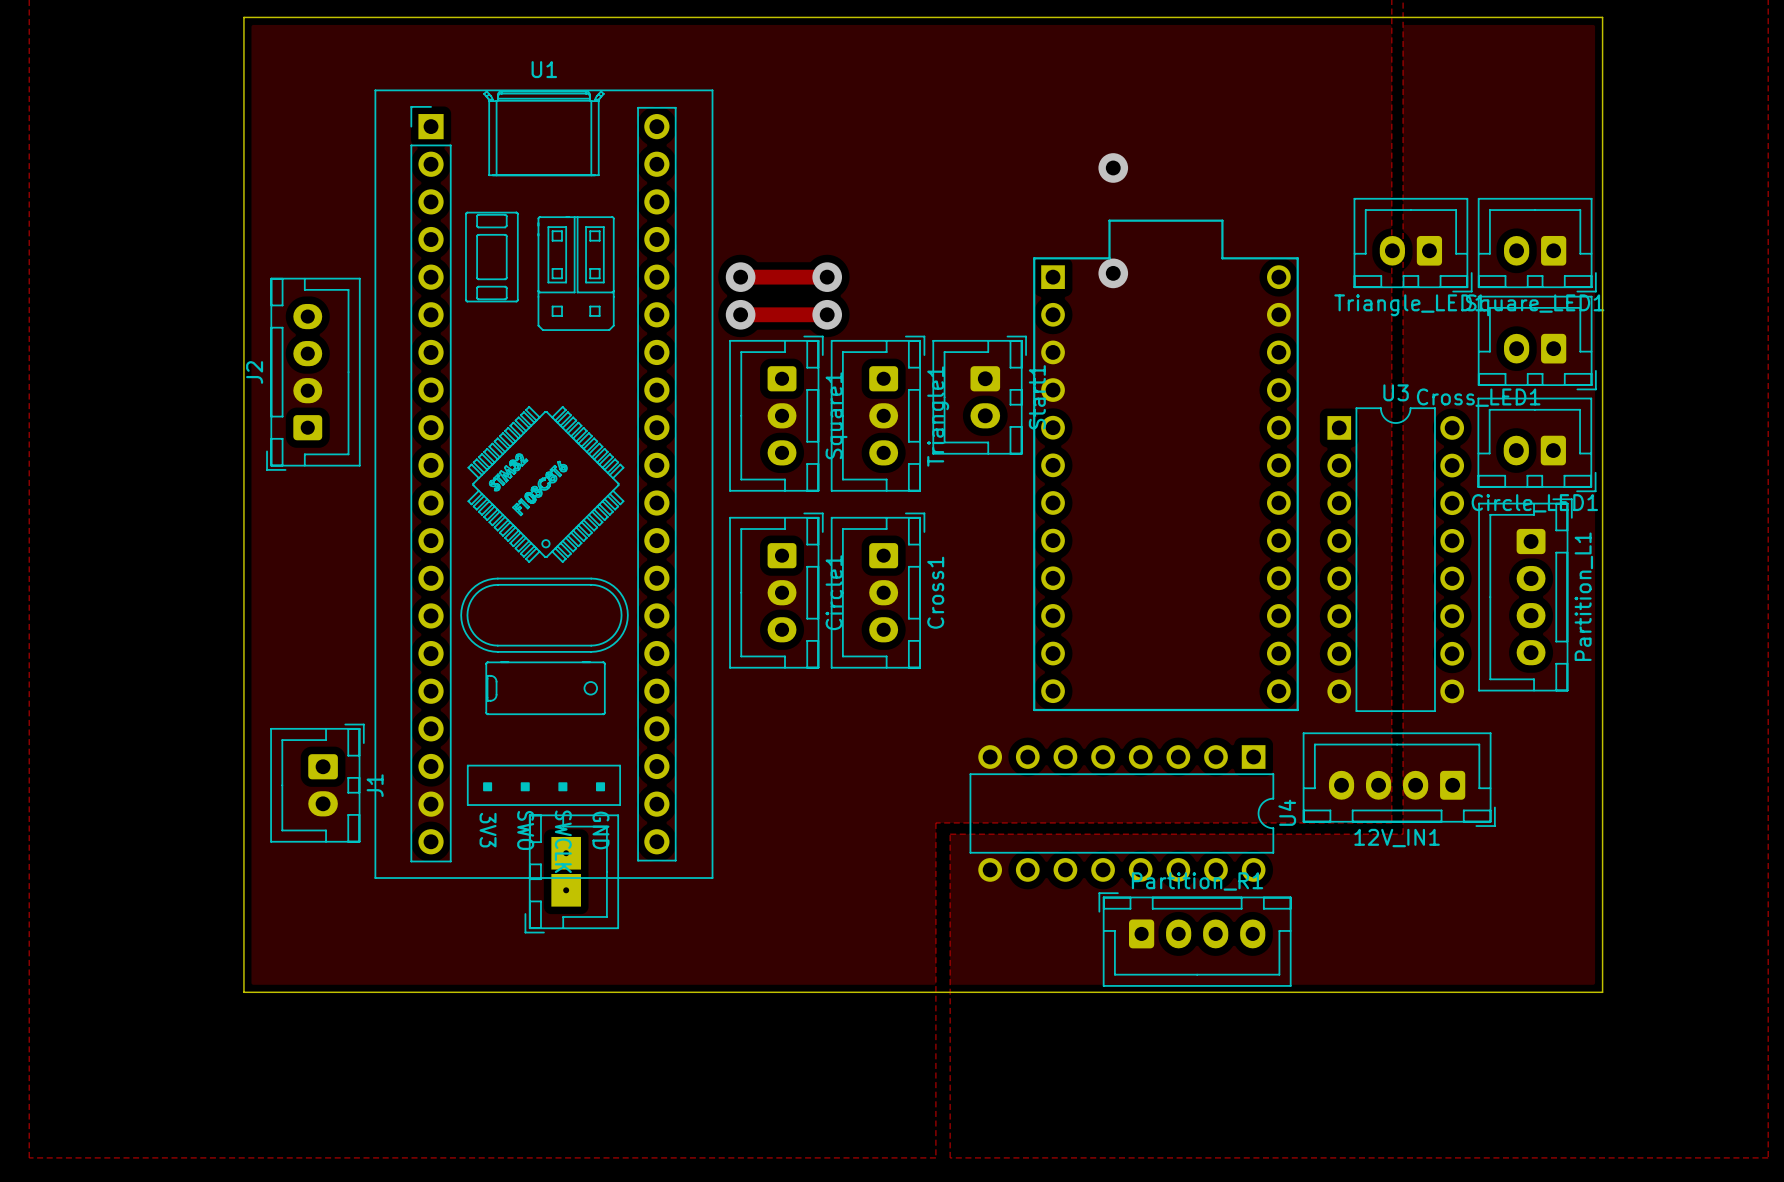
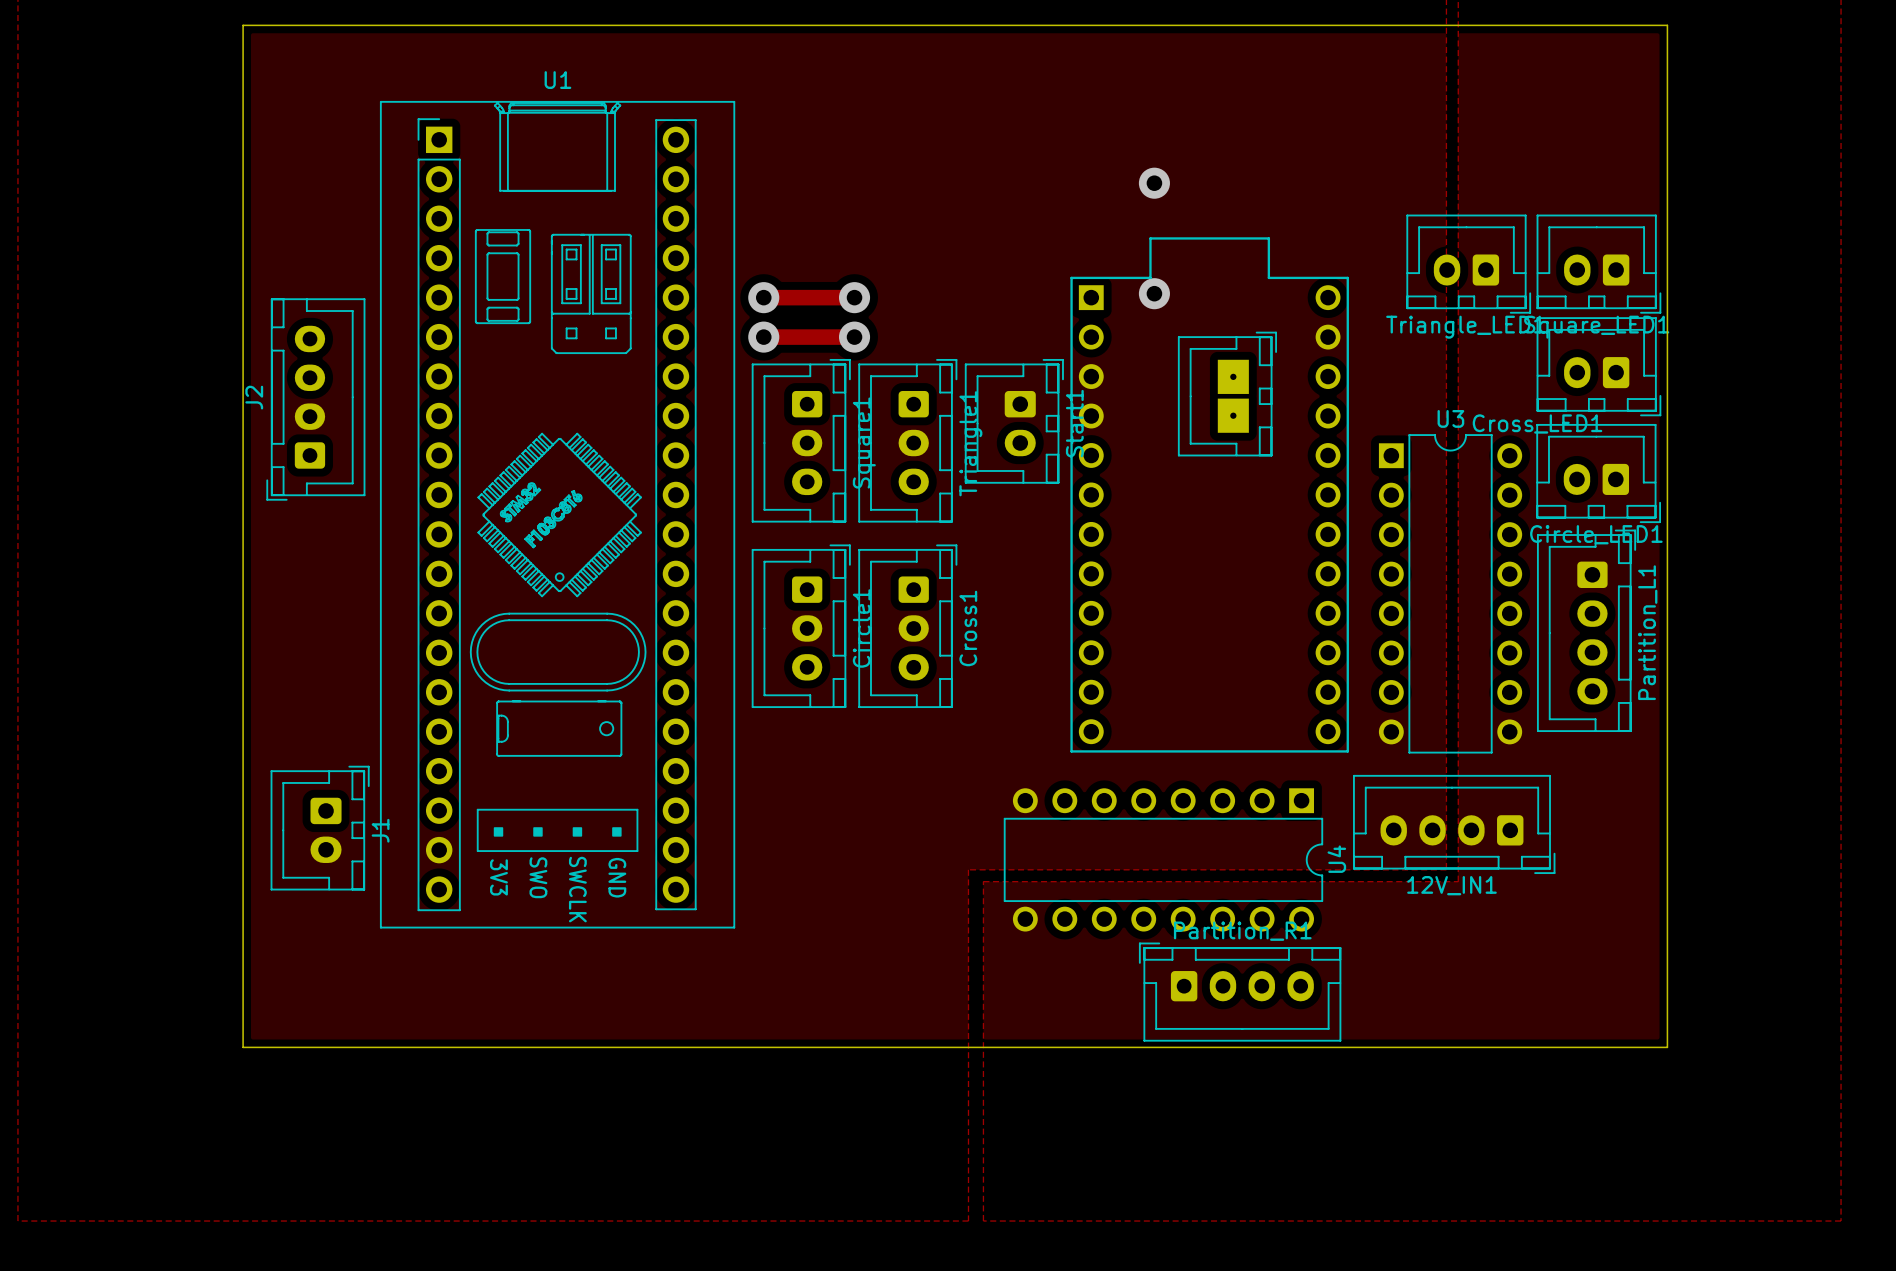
part: none -> (1227, 394)
part: (571, 873) -> none

